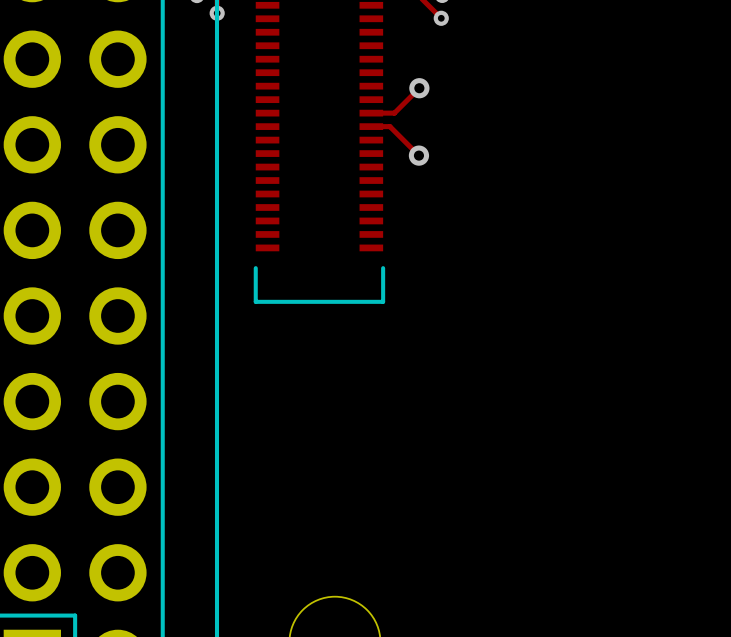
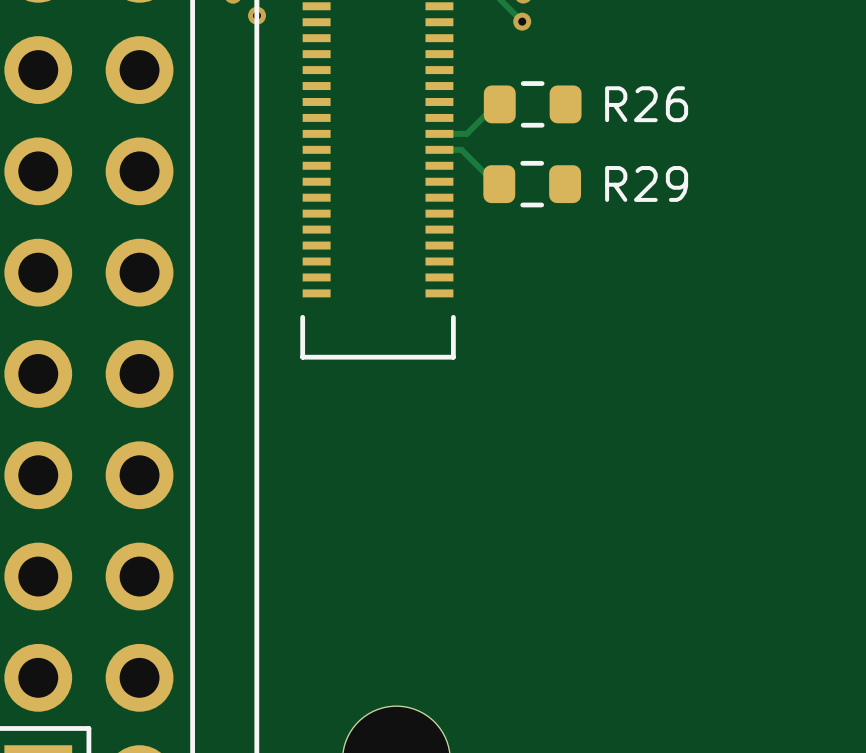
via: (419, 88) -> none
R26: none -> (532, 104)
via: (418, 155) -> none
R29: none -> (532, 184)

